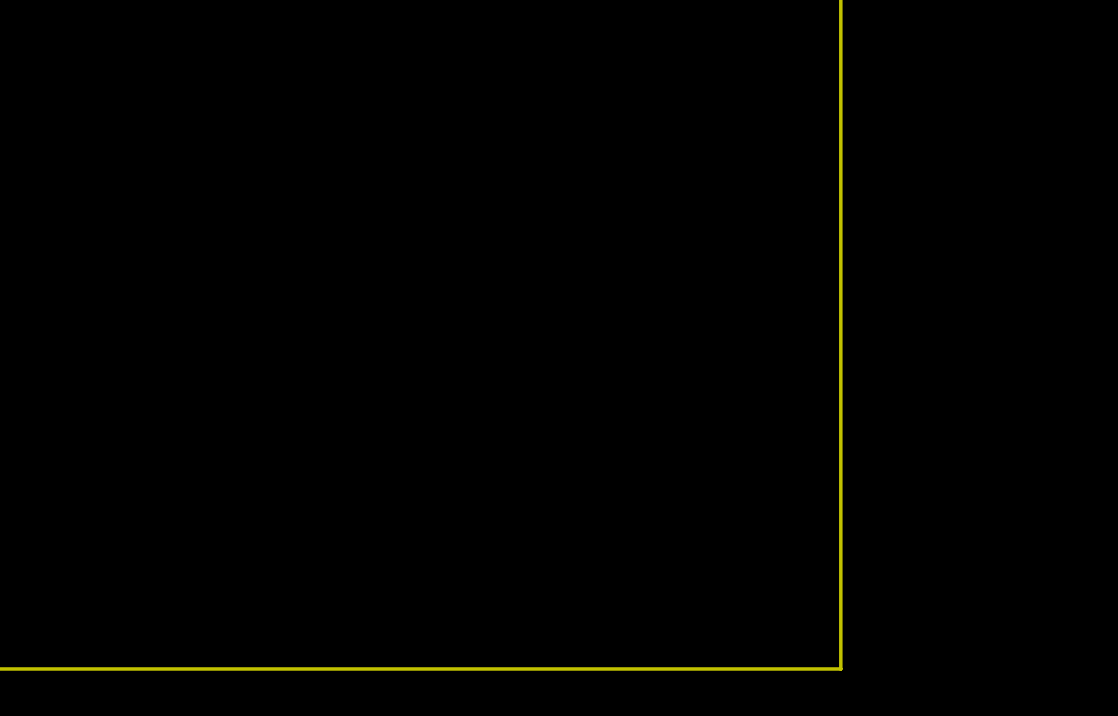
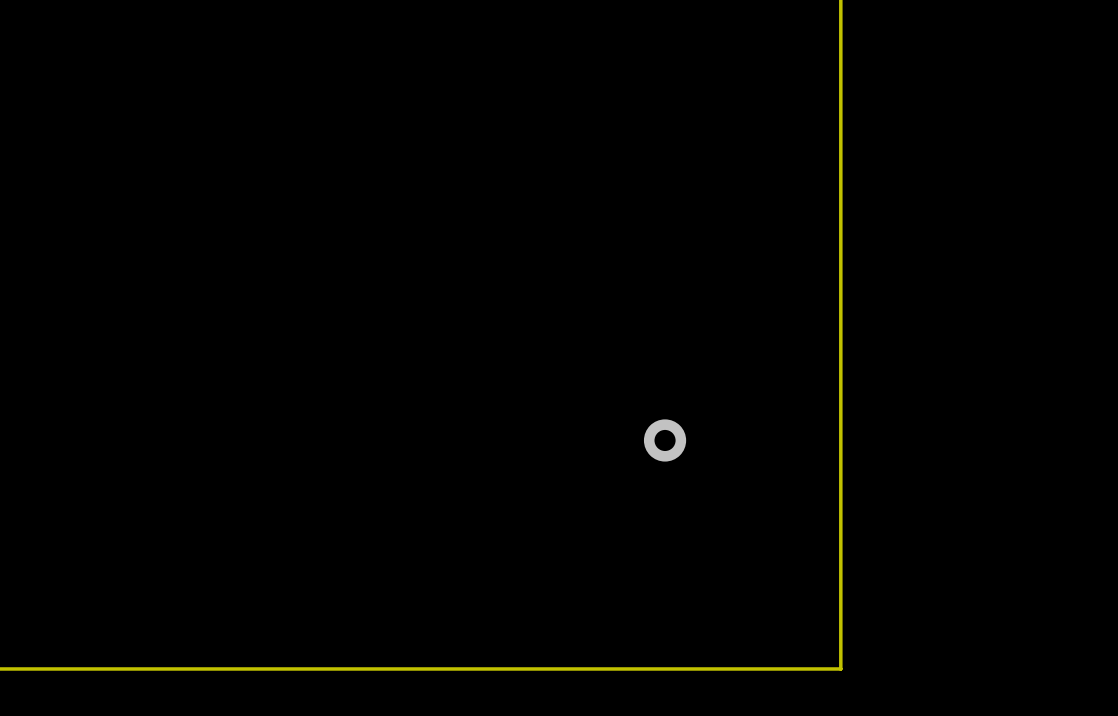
via: none -> (665, 440)

